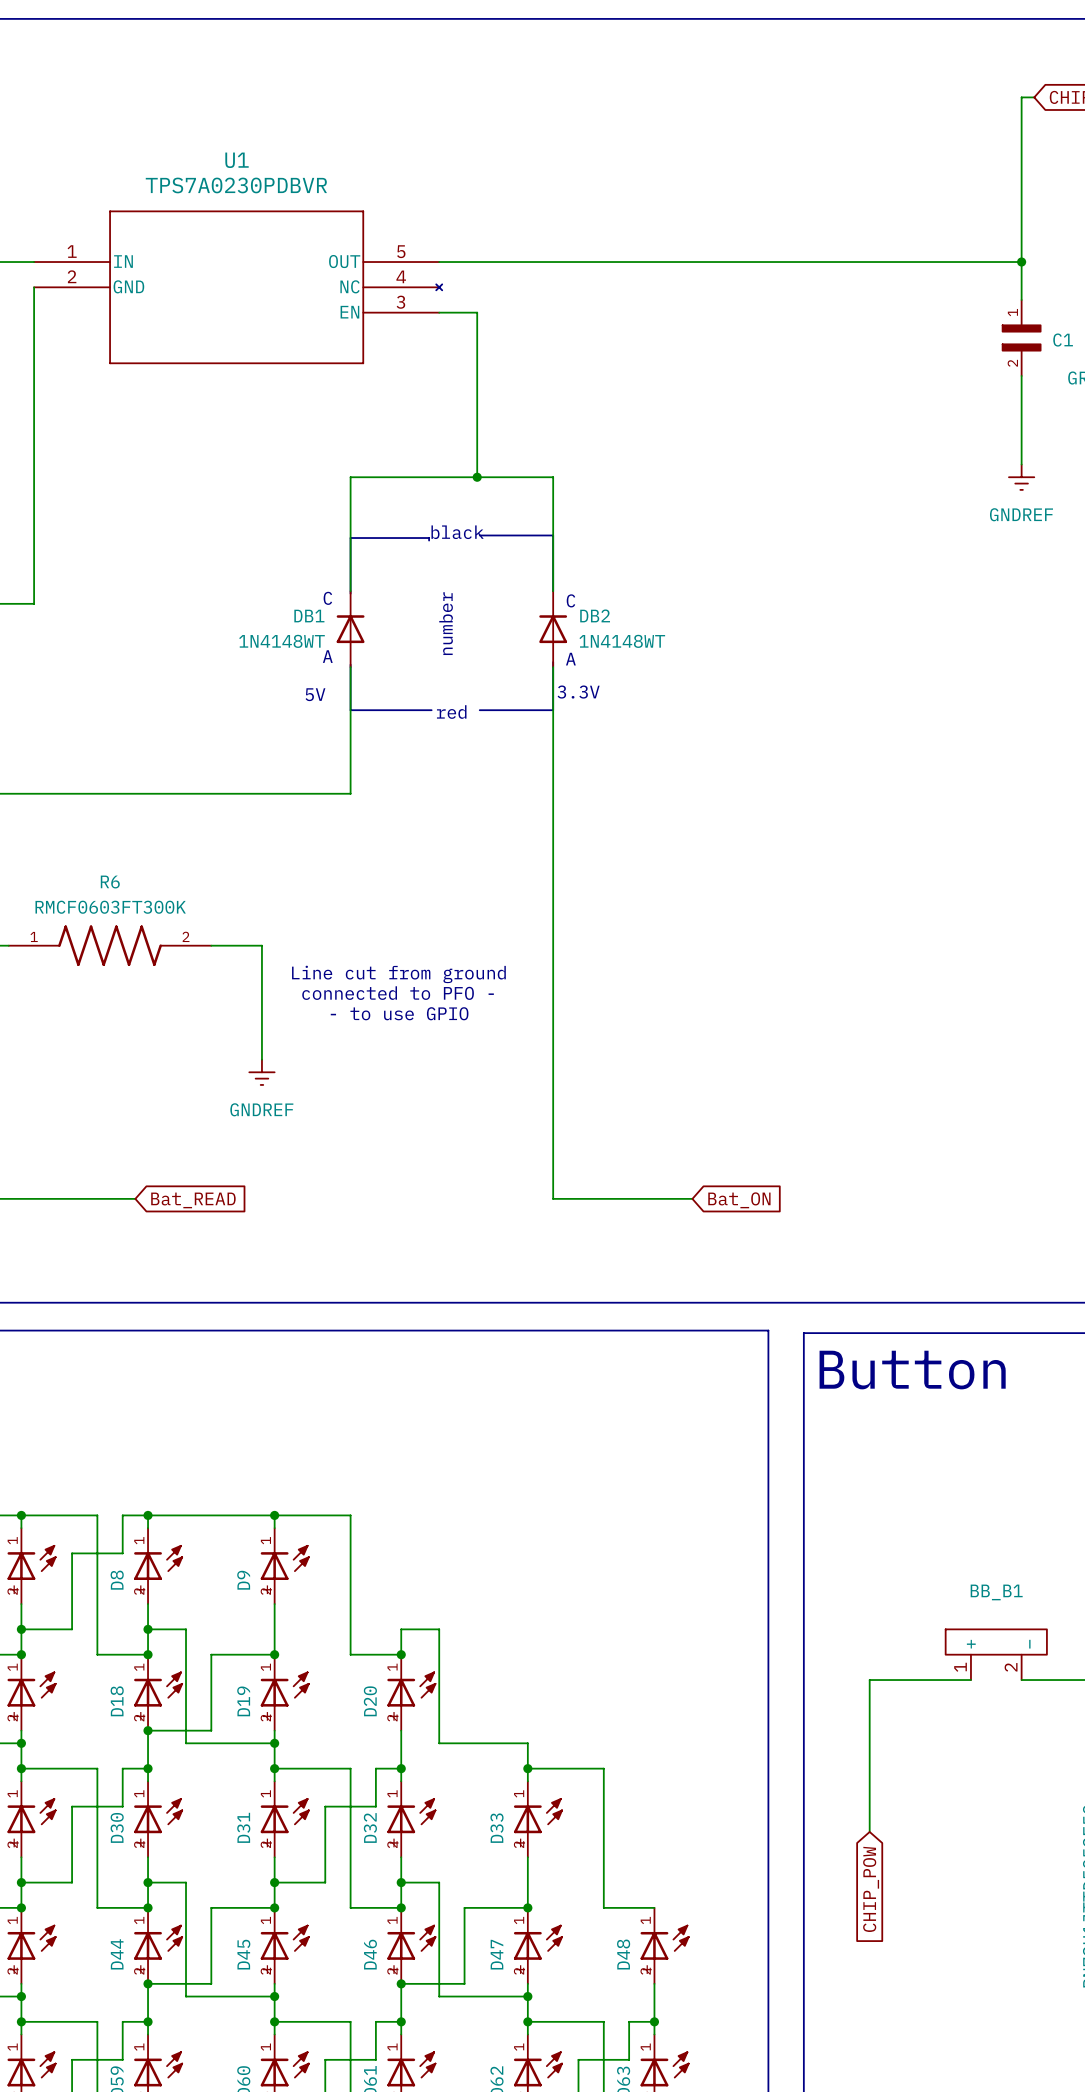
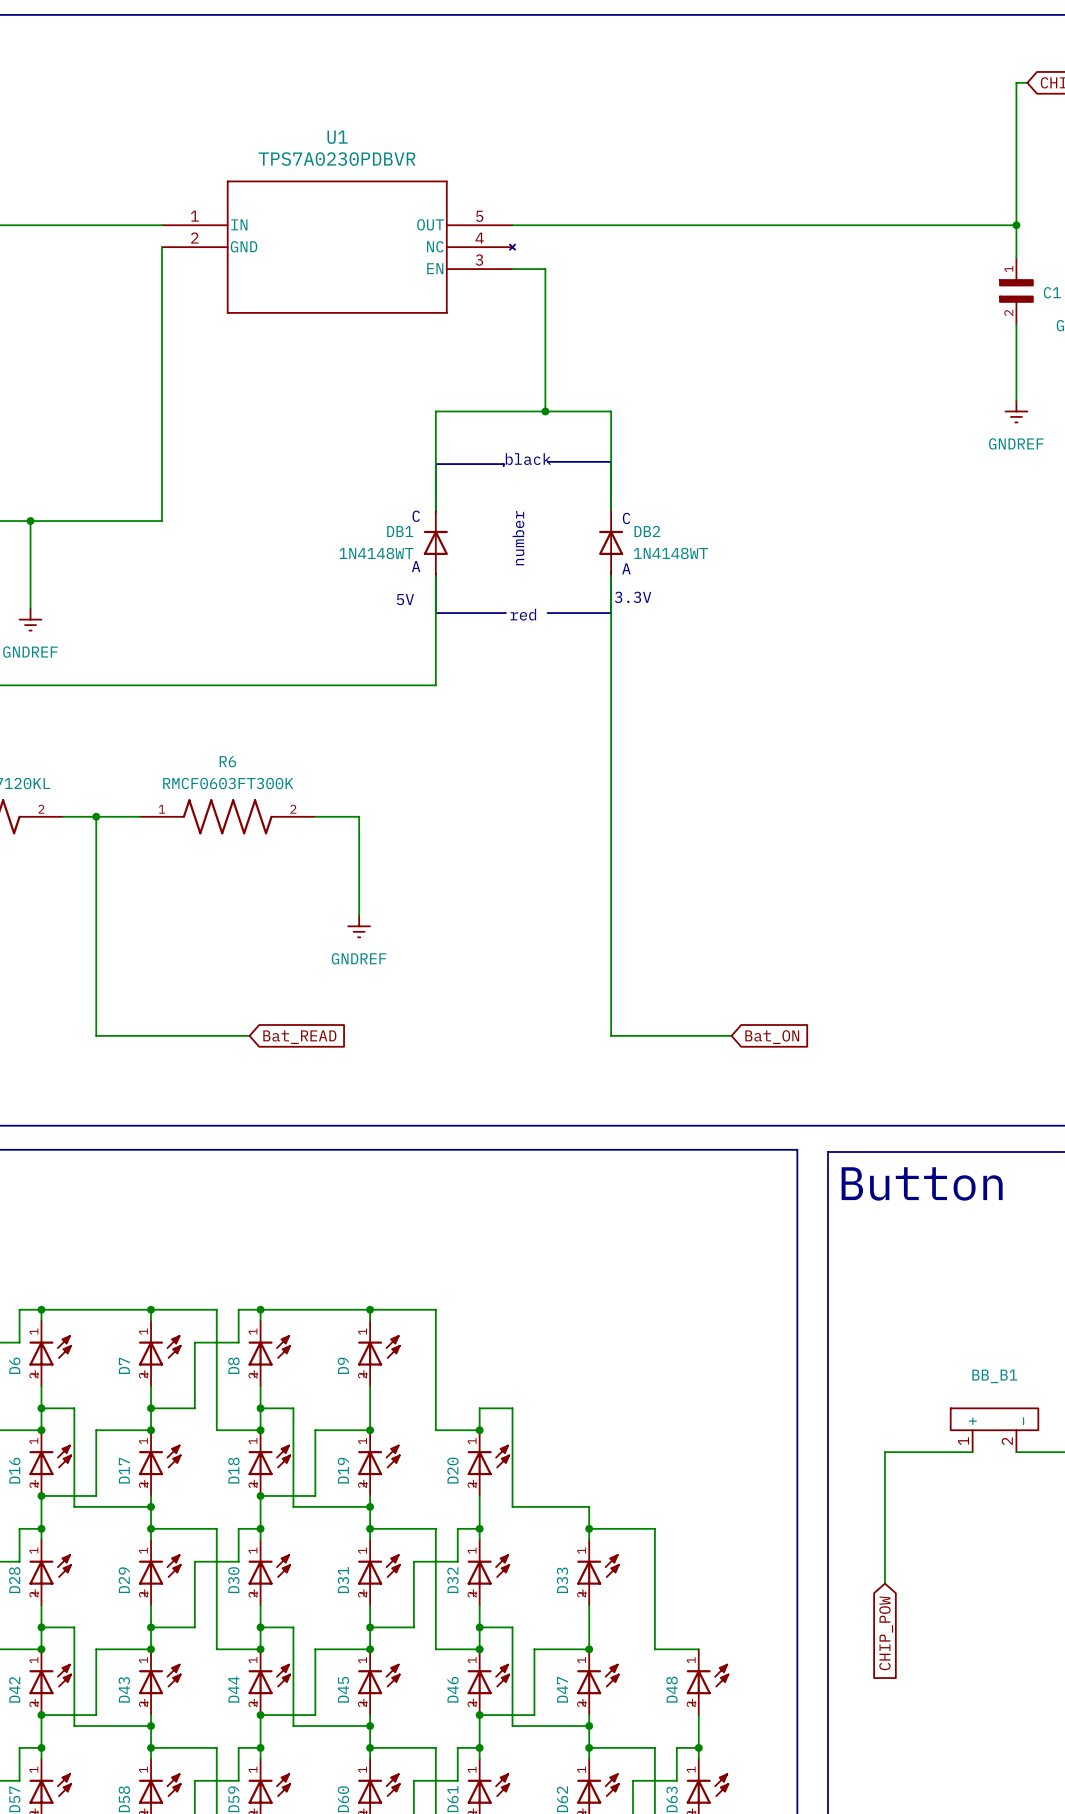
text: Line cut from ground (398, 974) -> none
text: connected to PFO - (398, 993) -> none
text: - to use GPIO (399, 1013) -> none

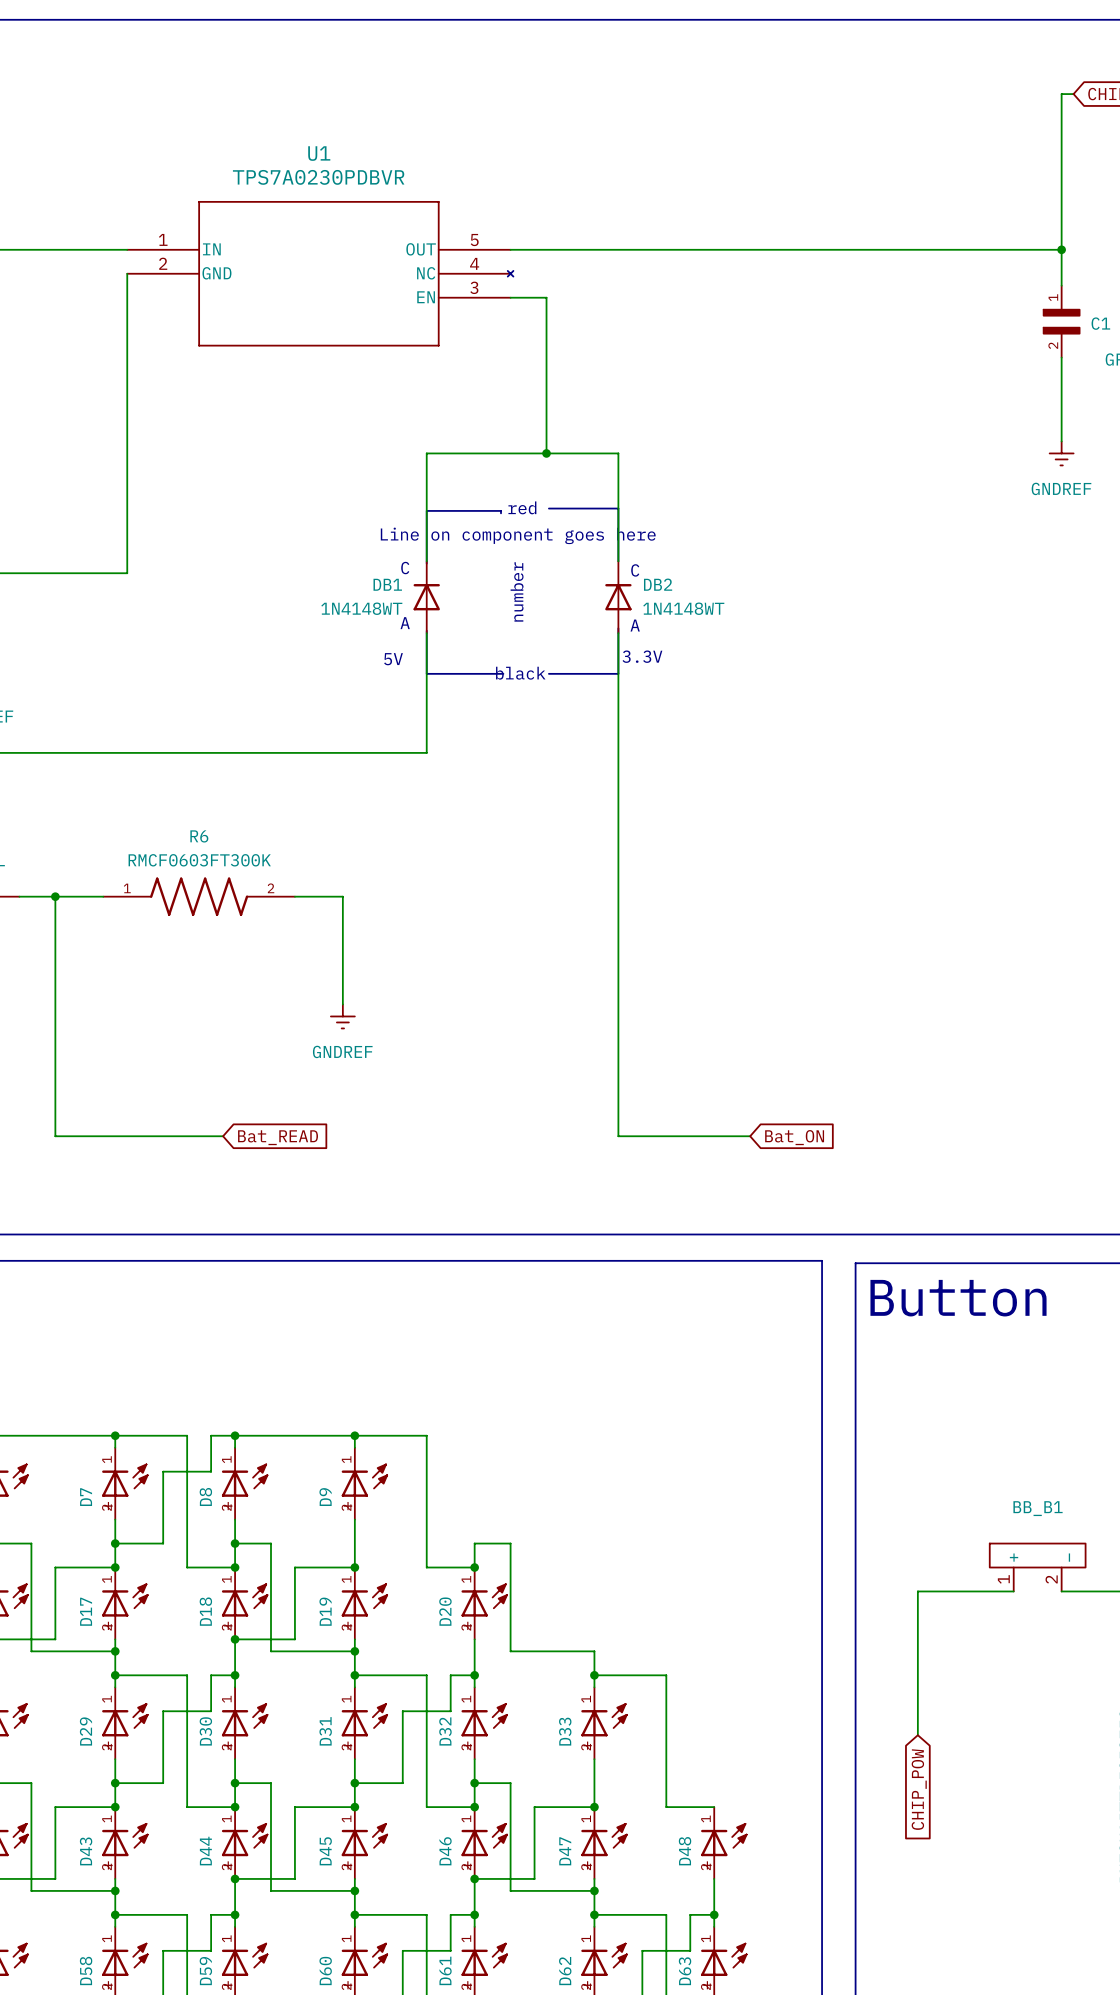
text: black (528, 459) -> red (522, 507)
text: none -> Line on component goes here (518, 535)
text: red (523, 614) -> black (520, 673)

